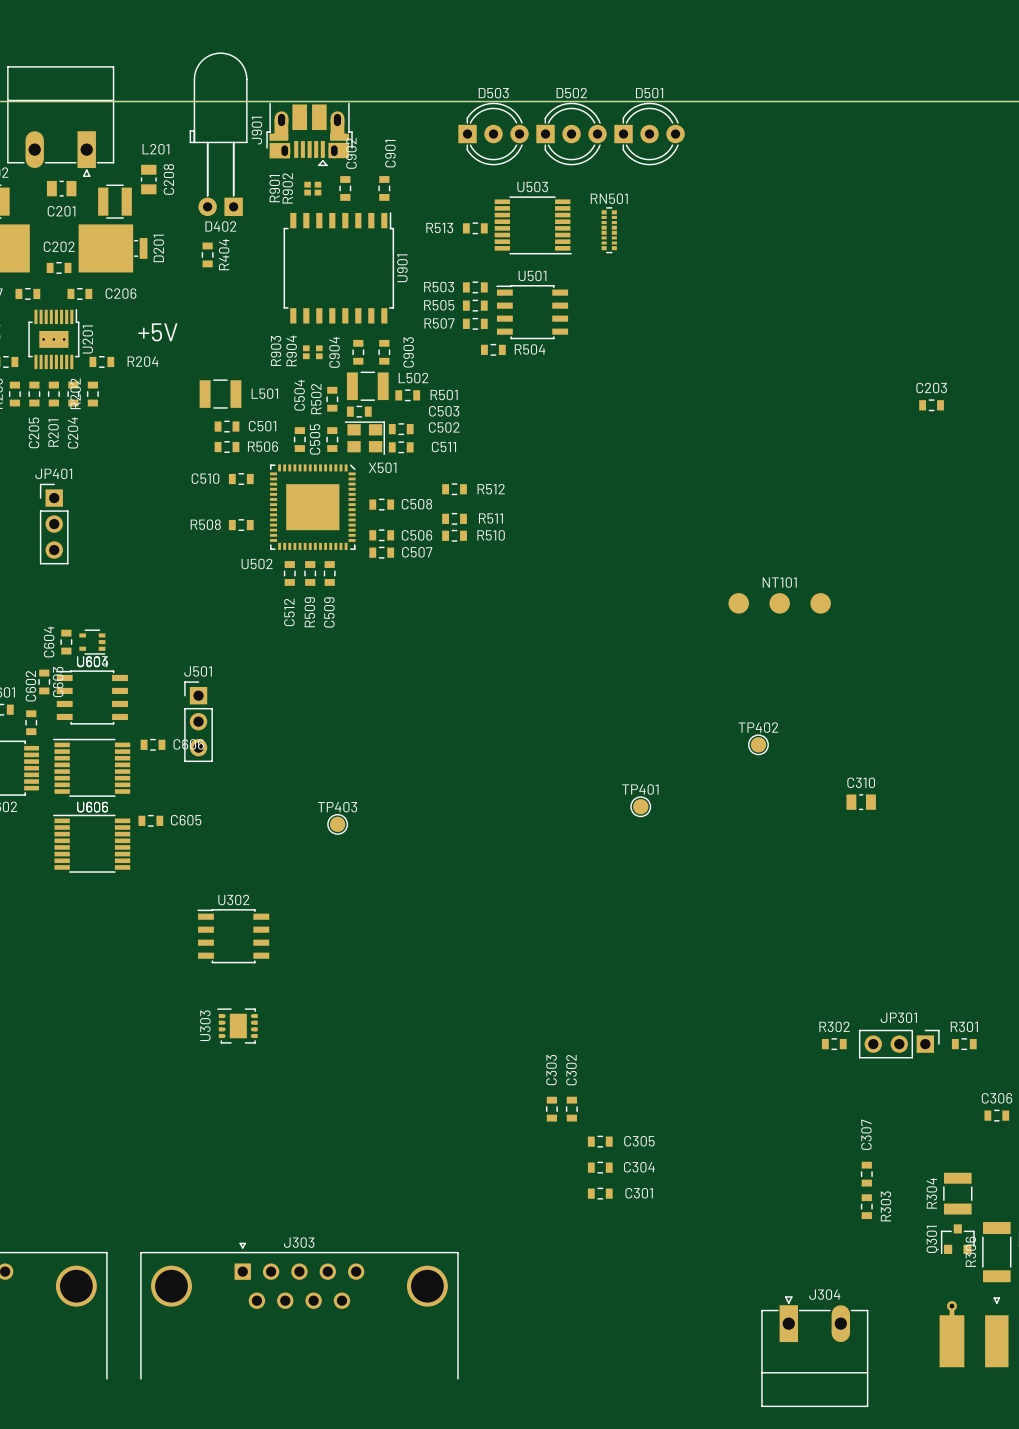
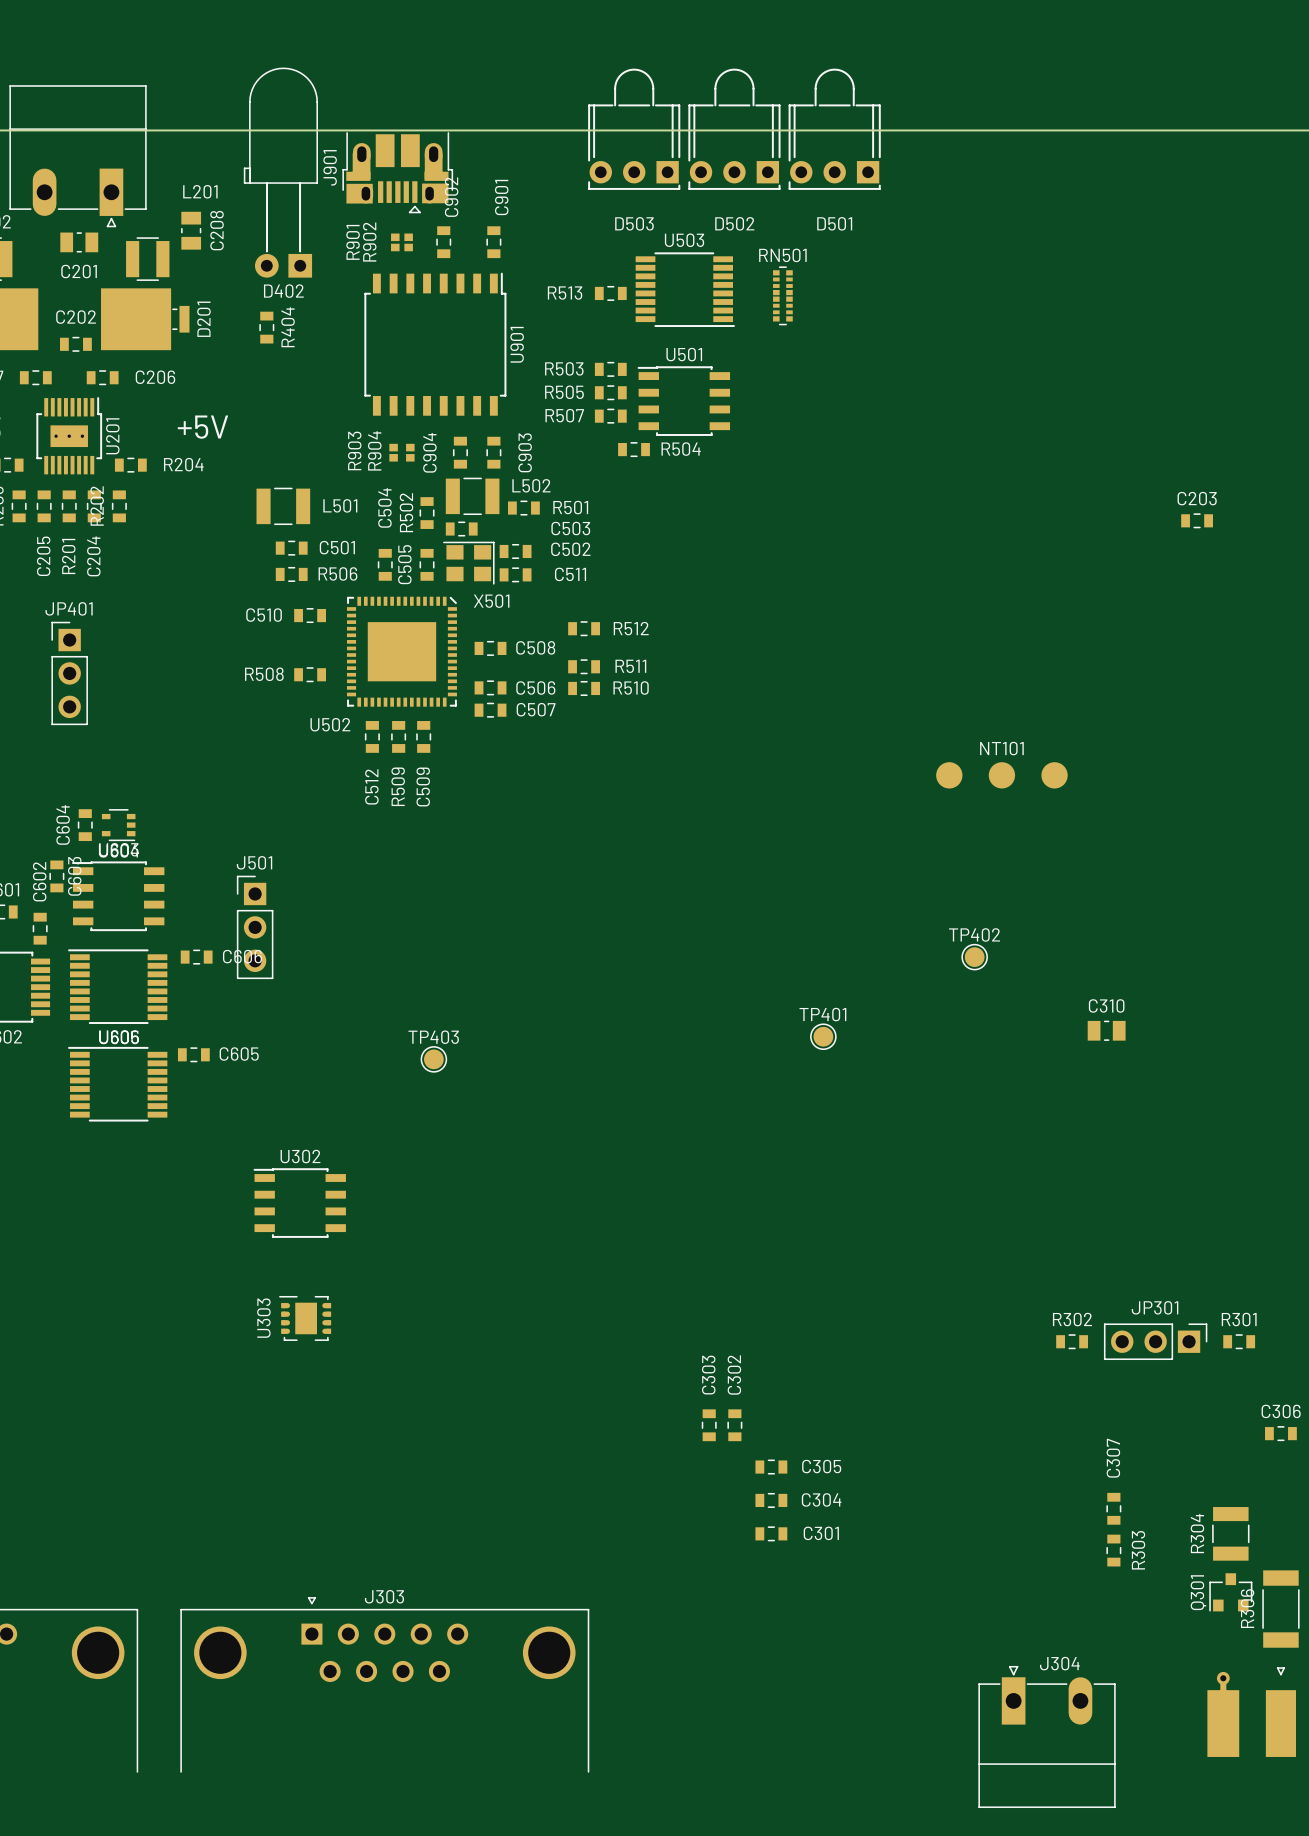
D503 name position: D503 (493, 93) -> D503 (634, 223)
D502 name position: D502 (571, 93) -> D502 (734, 223)
D501 name position: D501 (649, 93) -> D501 (834, 223)
D503 footprint: [458, 102, 529, 166] -> [588, 68, 681, 190]
D502 footprint: [536, 102, 607, 166] -> [688, 68, 781, 190]
D501 footprint: [614, 102, 685, 166] -> [788, 68, 881, 190]

